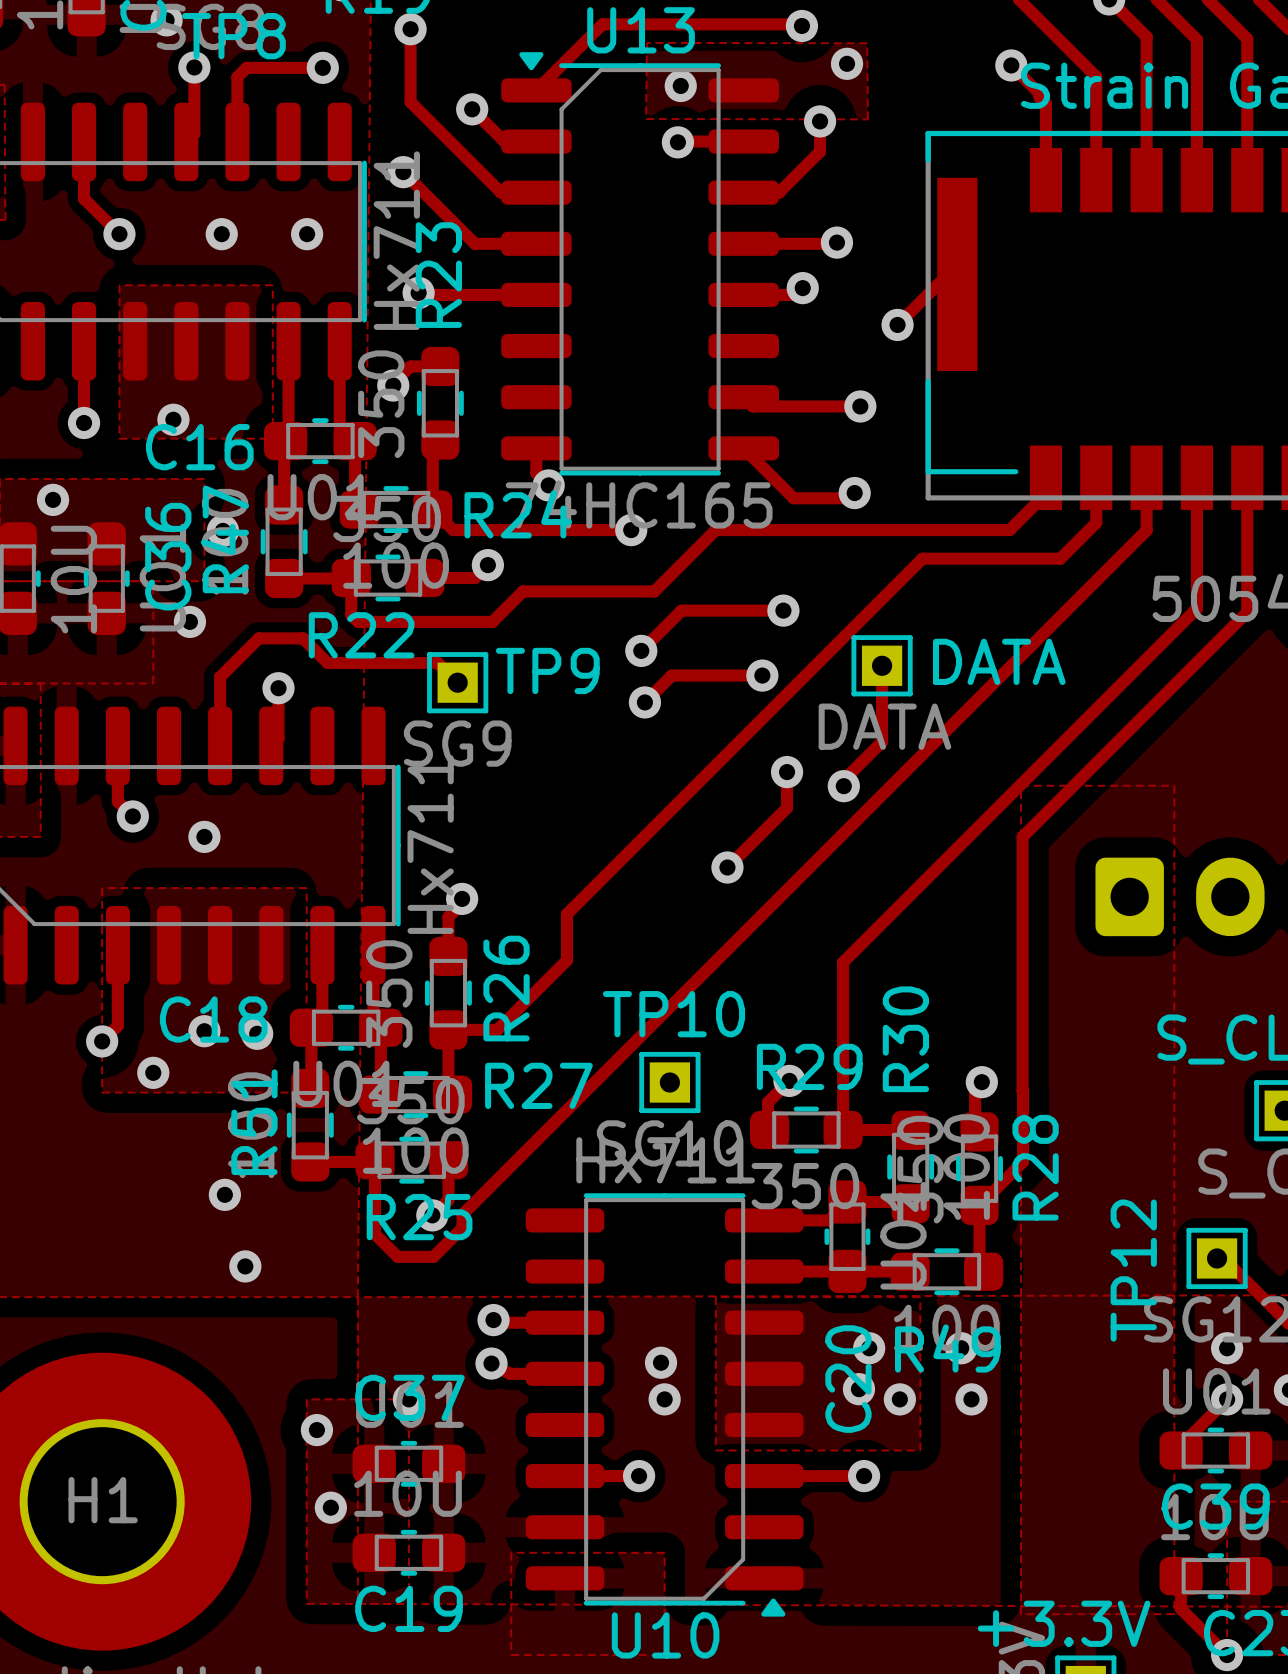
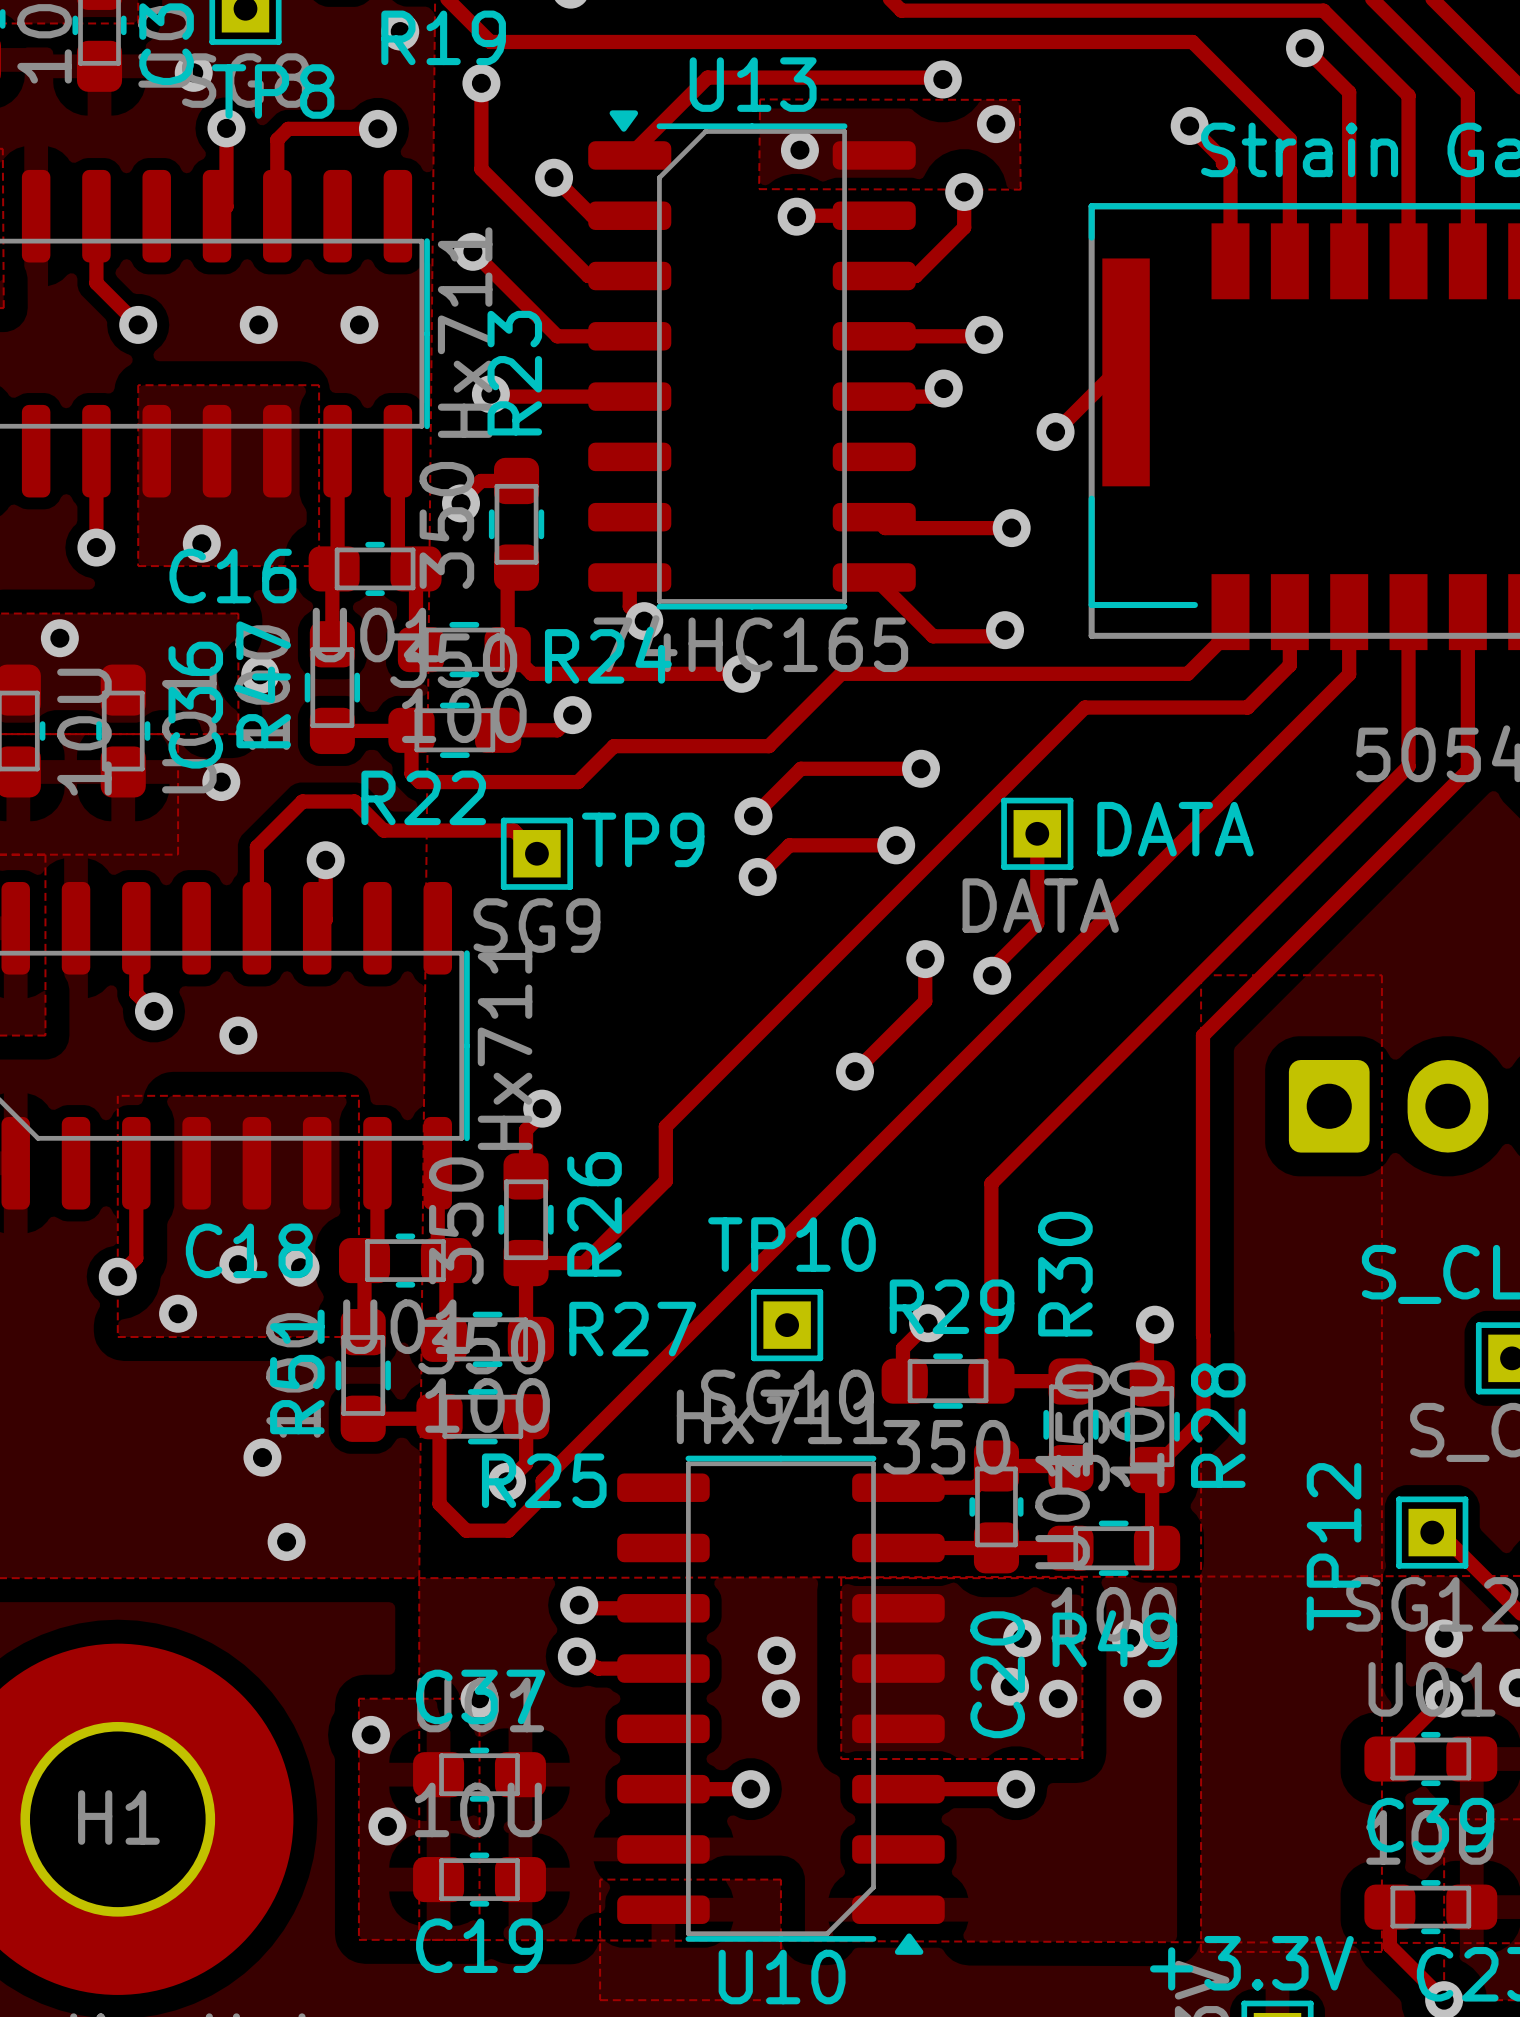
R25 name position: R25 (419, 1217) -> R25 (544, 1480)

